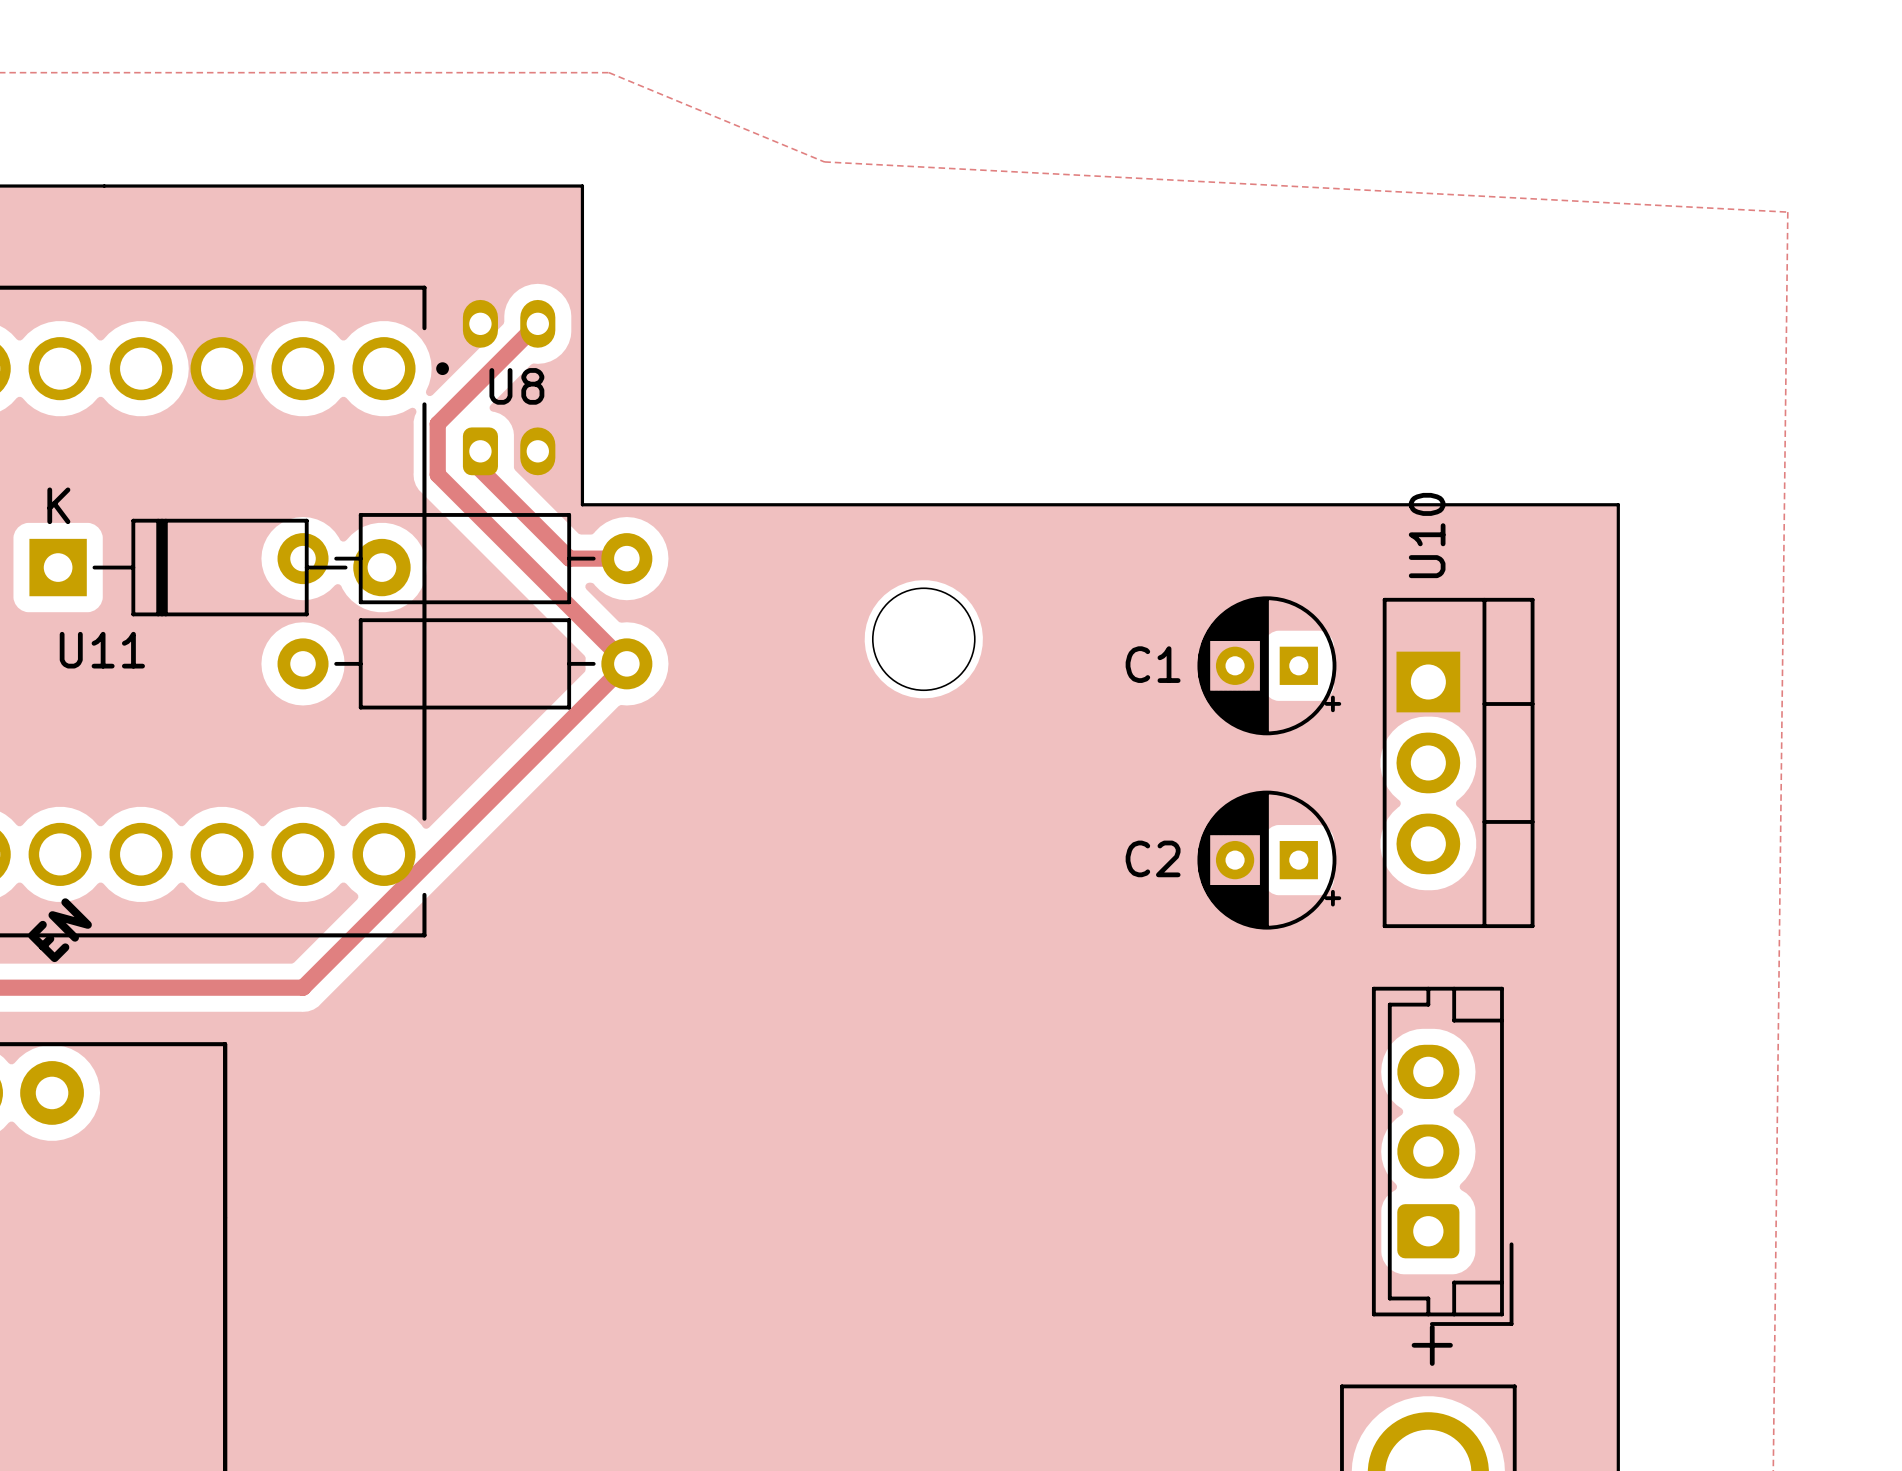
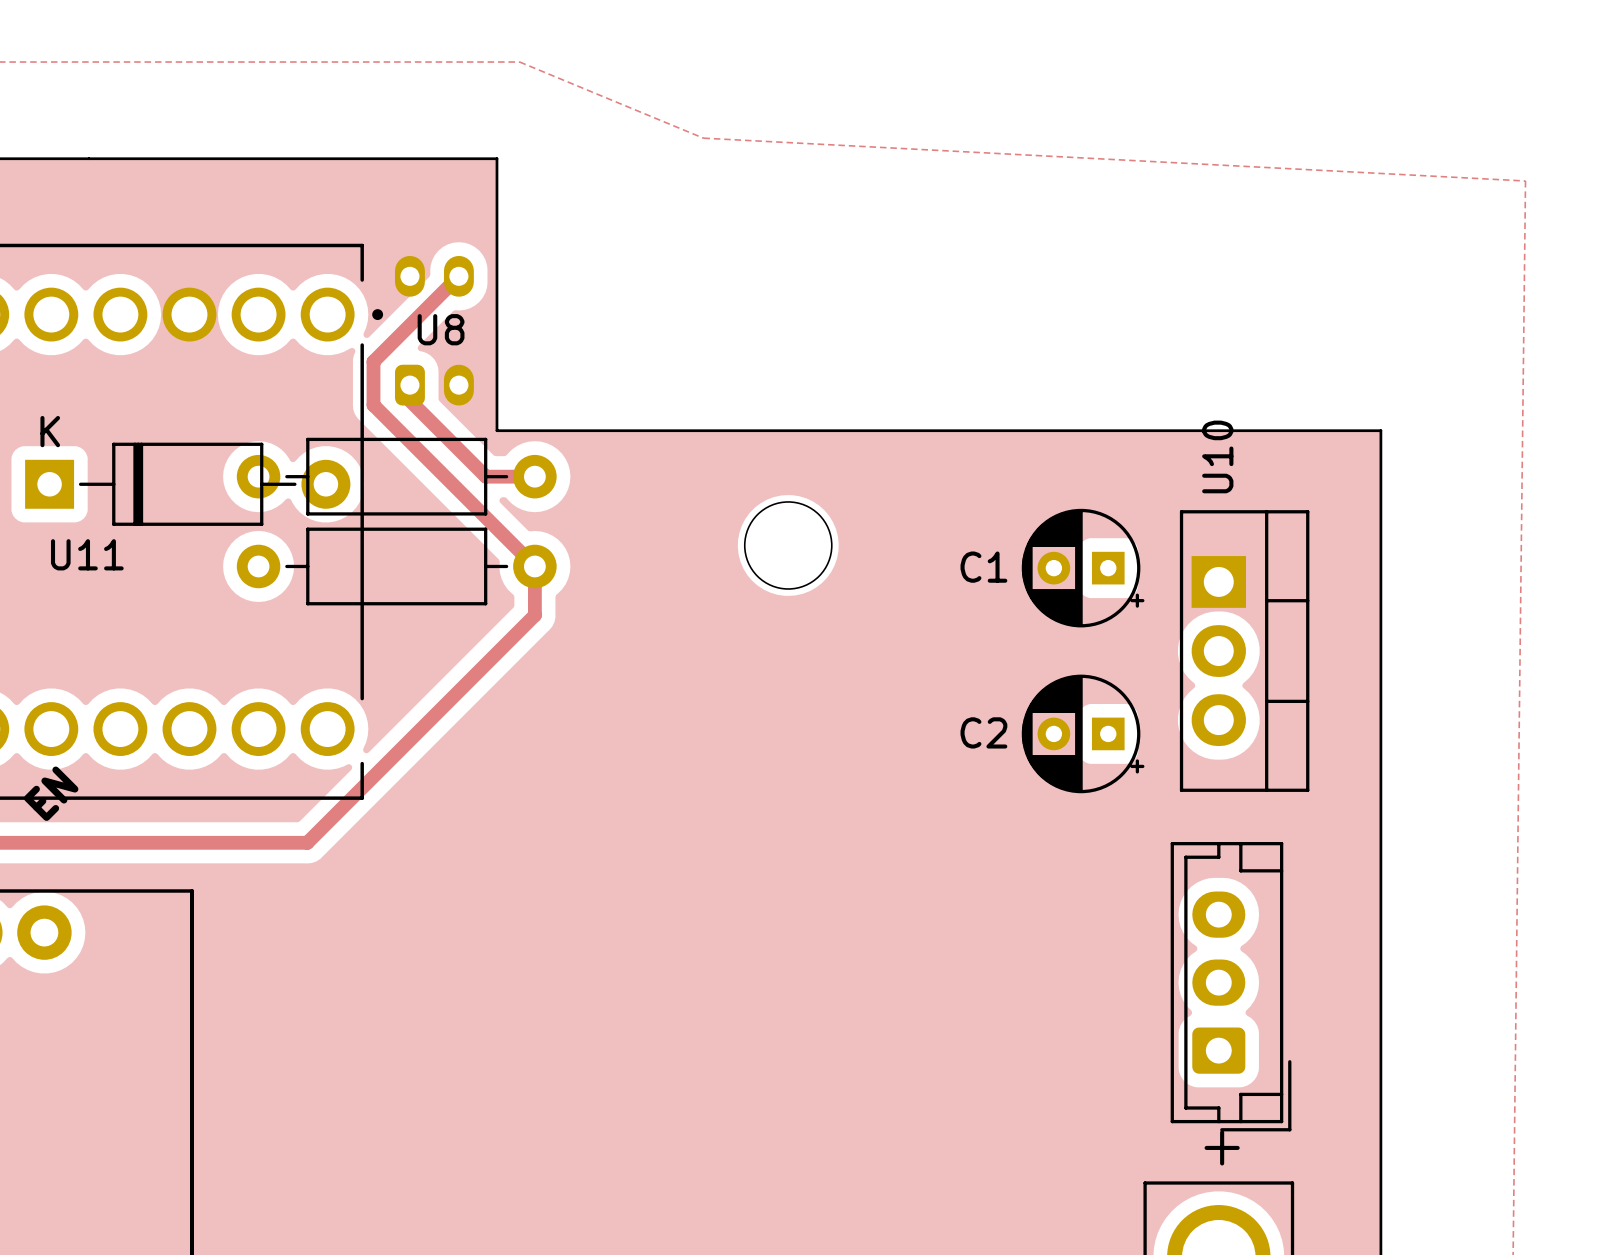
track: (626, 663) (303, 987) -> (534, 566) (534, 615) (307, 842) (258, 842)

